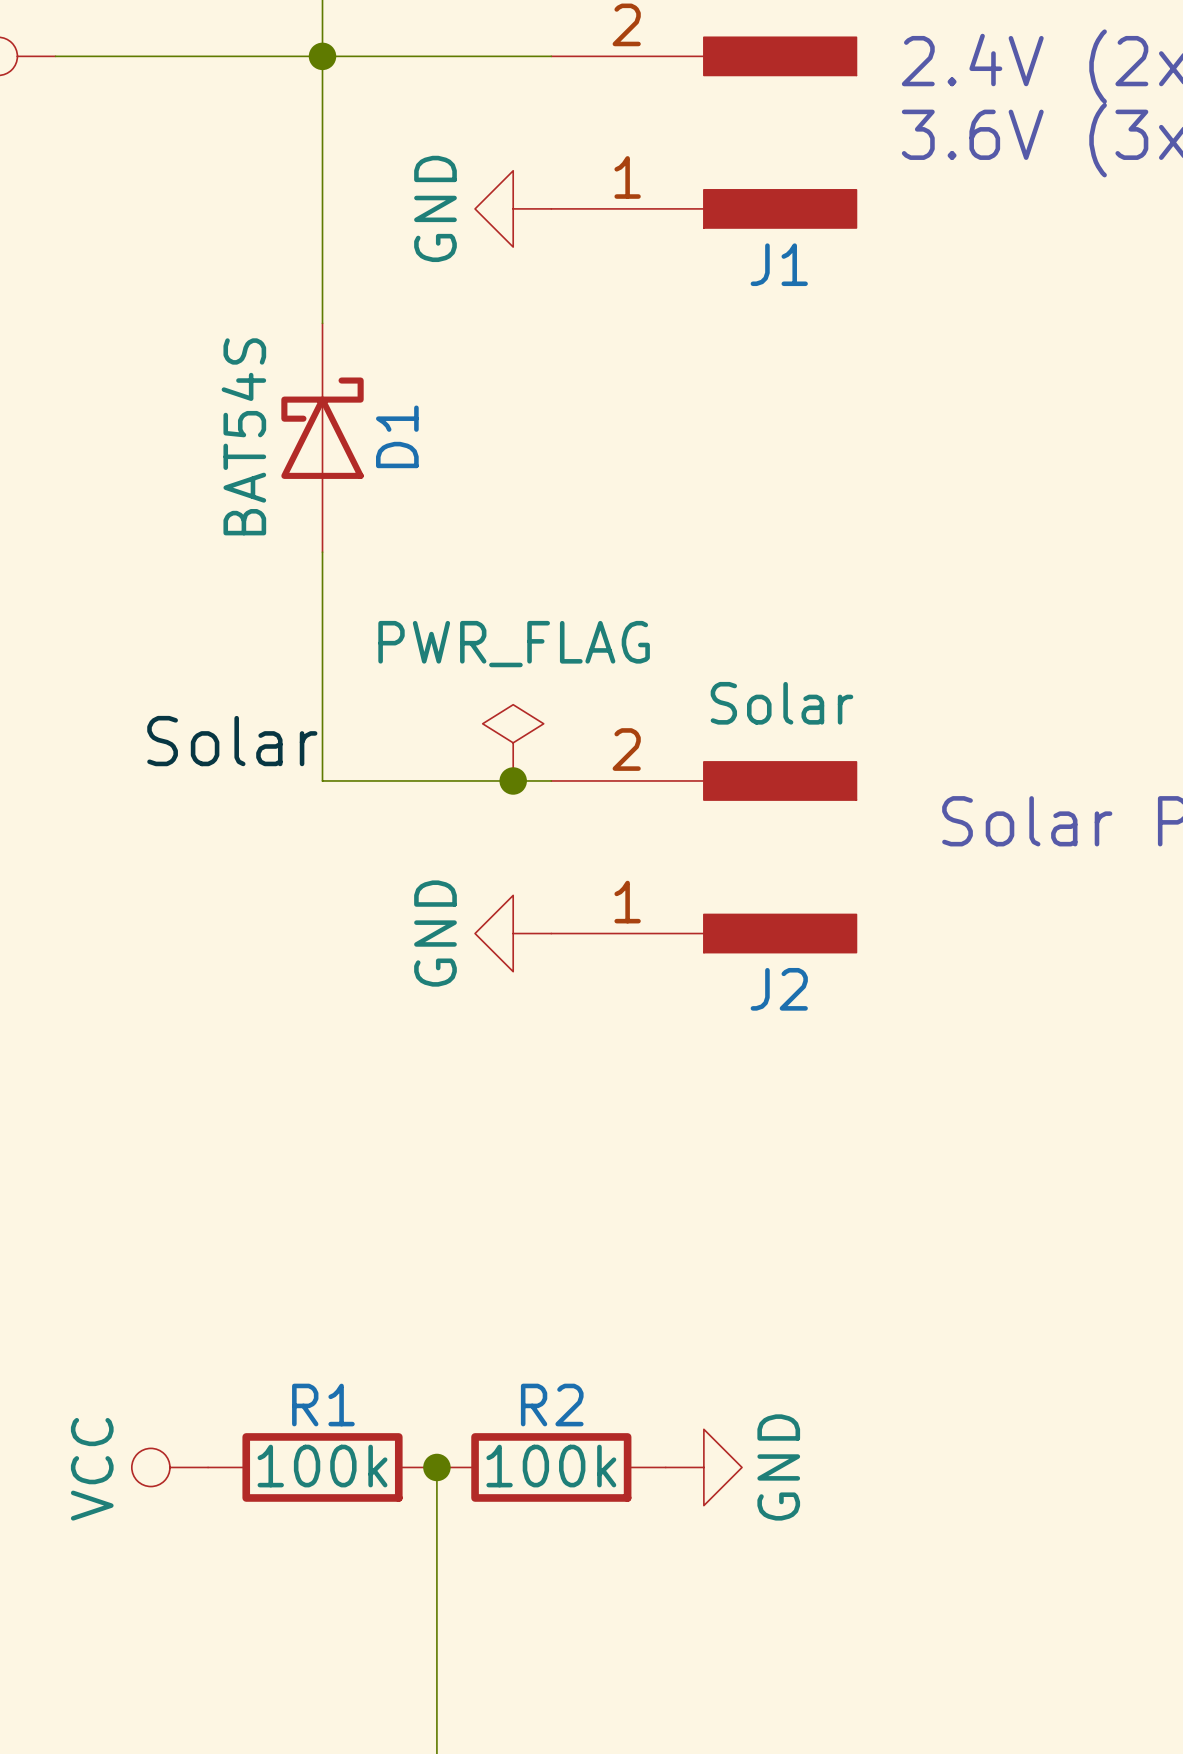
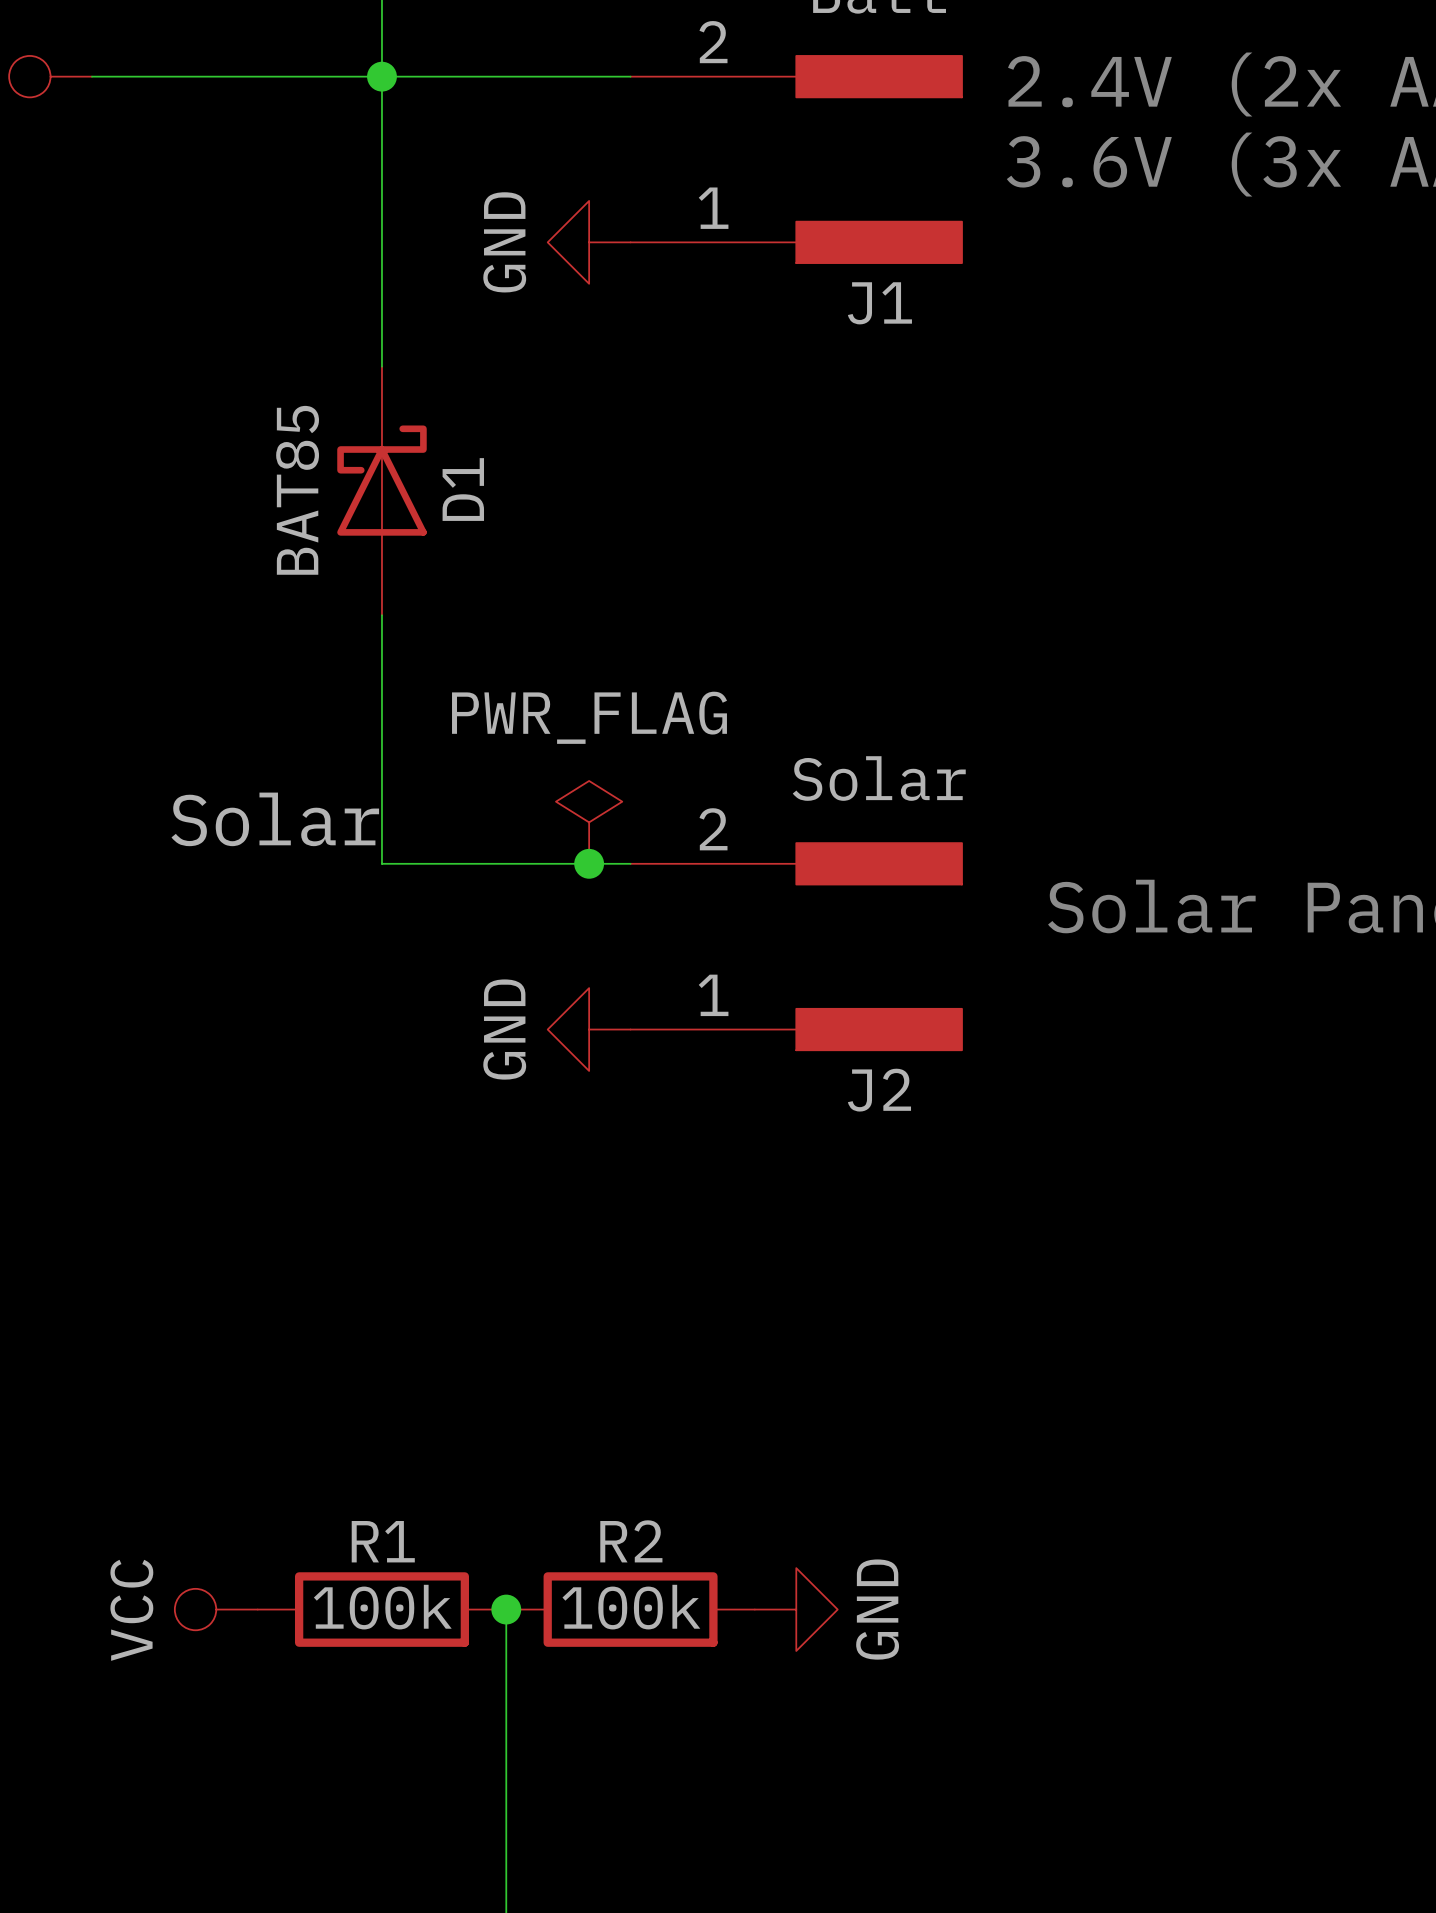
D1 value: BAT54S (243, 436) -> BAT85 (297, 490)

